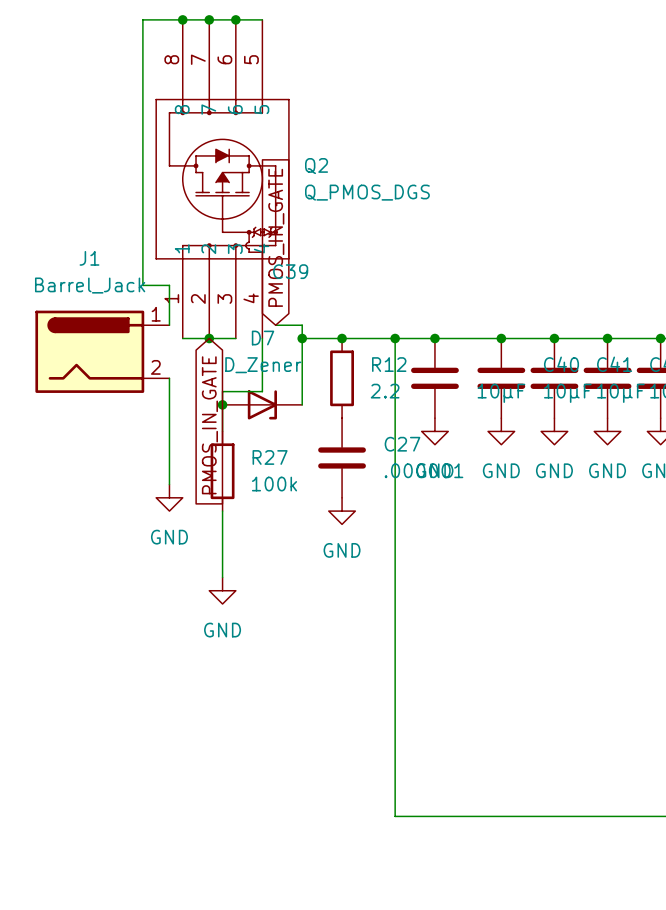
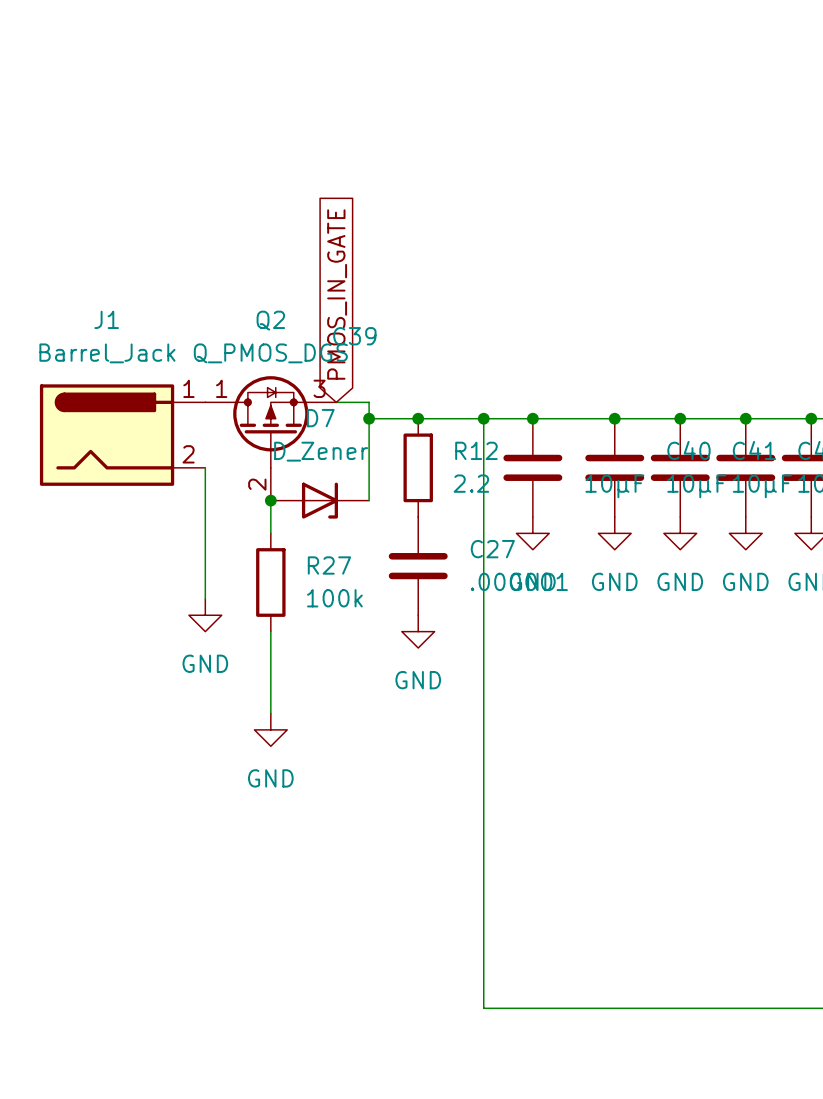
Q2 symbol: [155, 19, 290, 339] -> [205, 376, 337, 501]
junction: (182, 19) -> none
junction: (209, 19) -> none
junction: (235, 19) -> none
wire: (262, 19) (142, 19) (142, 285) (169, 285) (169, 325) -> none
Q2 name position: Q2 (316, 166) -> Q2 (270, 320)
Q2 value position: Q_PMOS_DGS (367, 192) -> Q_PMOS_DGS (270, 353)
wire: (182, 338) (235, 338) -> none
junction: (209, 338) -> none
wire: (262, 338) (262, 391) (222, 391) (222, 404) -> none
global label: PMOS_IN_GATE (209, 425) -> none

